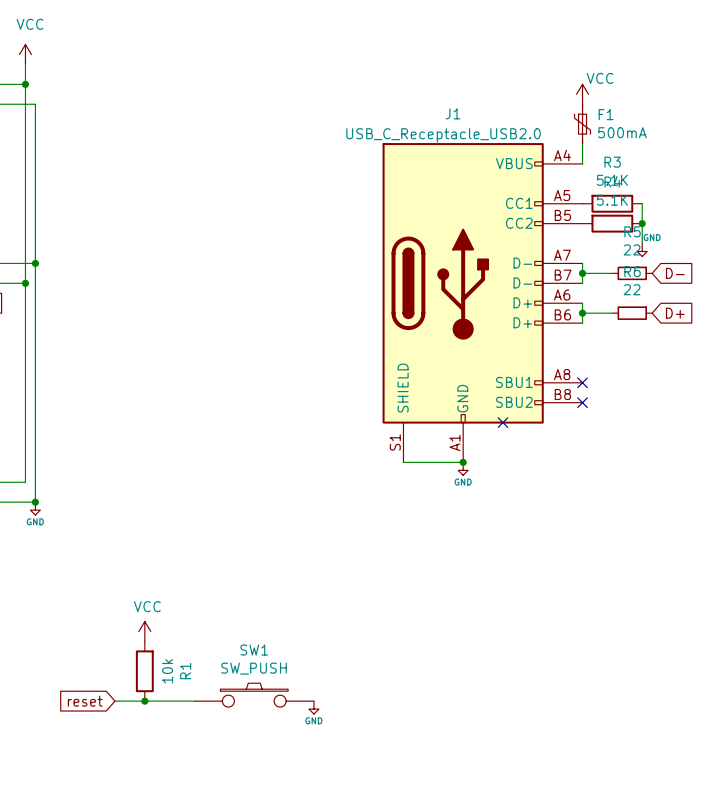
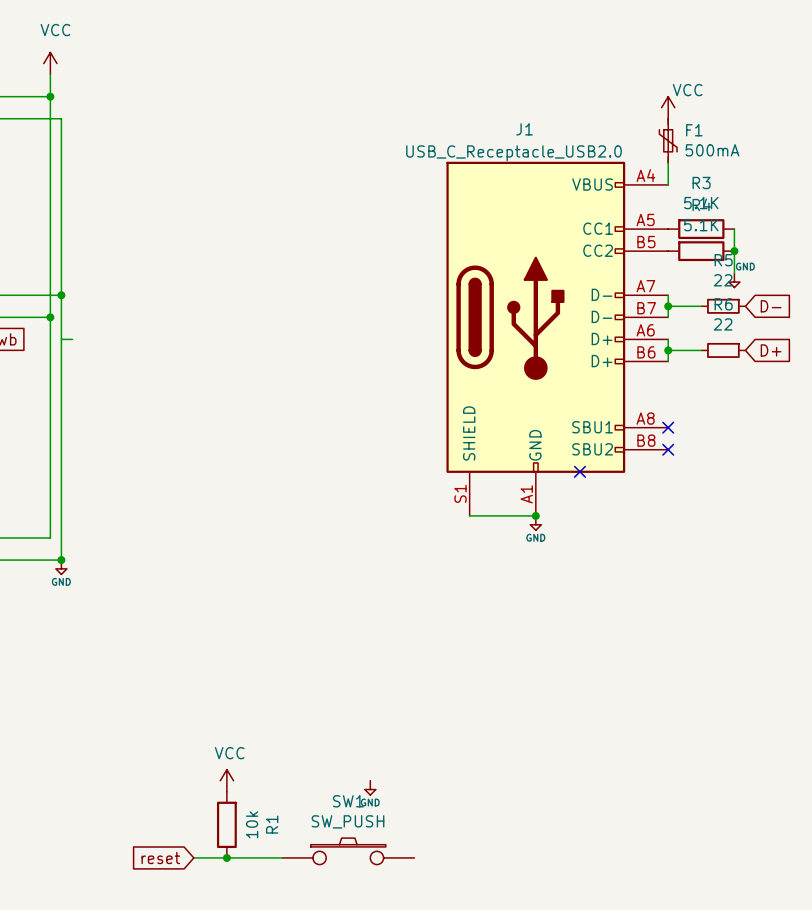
wire: none -> (61, 339) (72, 339)
power symbol position: VCC (144, 631) -> VCC (226, 780)
R1 position: (144, 671) -> (226, 824)
SW1 position: (254, 695) -> (348, 851)
global label position: reset (85, 701) -> reset (160, 857)
wire: (114, 701) (194, 701) -> (193, 857) (282, 857)
junction: (144, 701) -> none
junction: none -> (226, 857)

